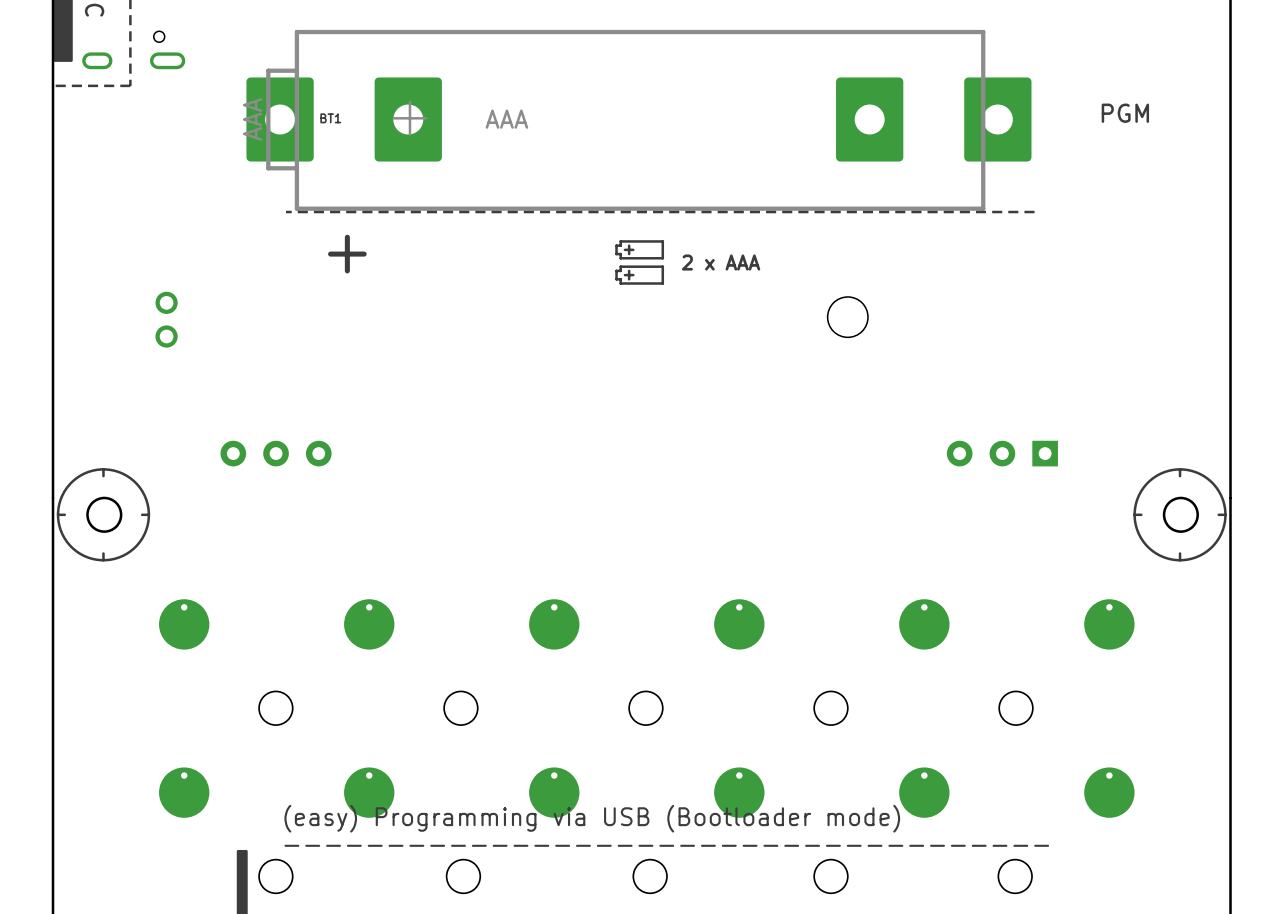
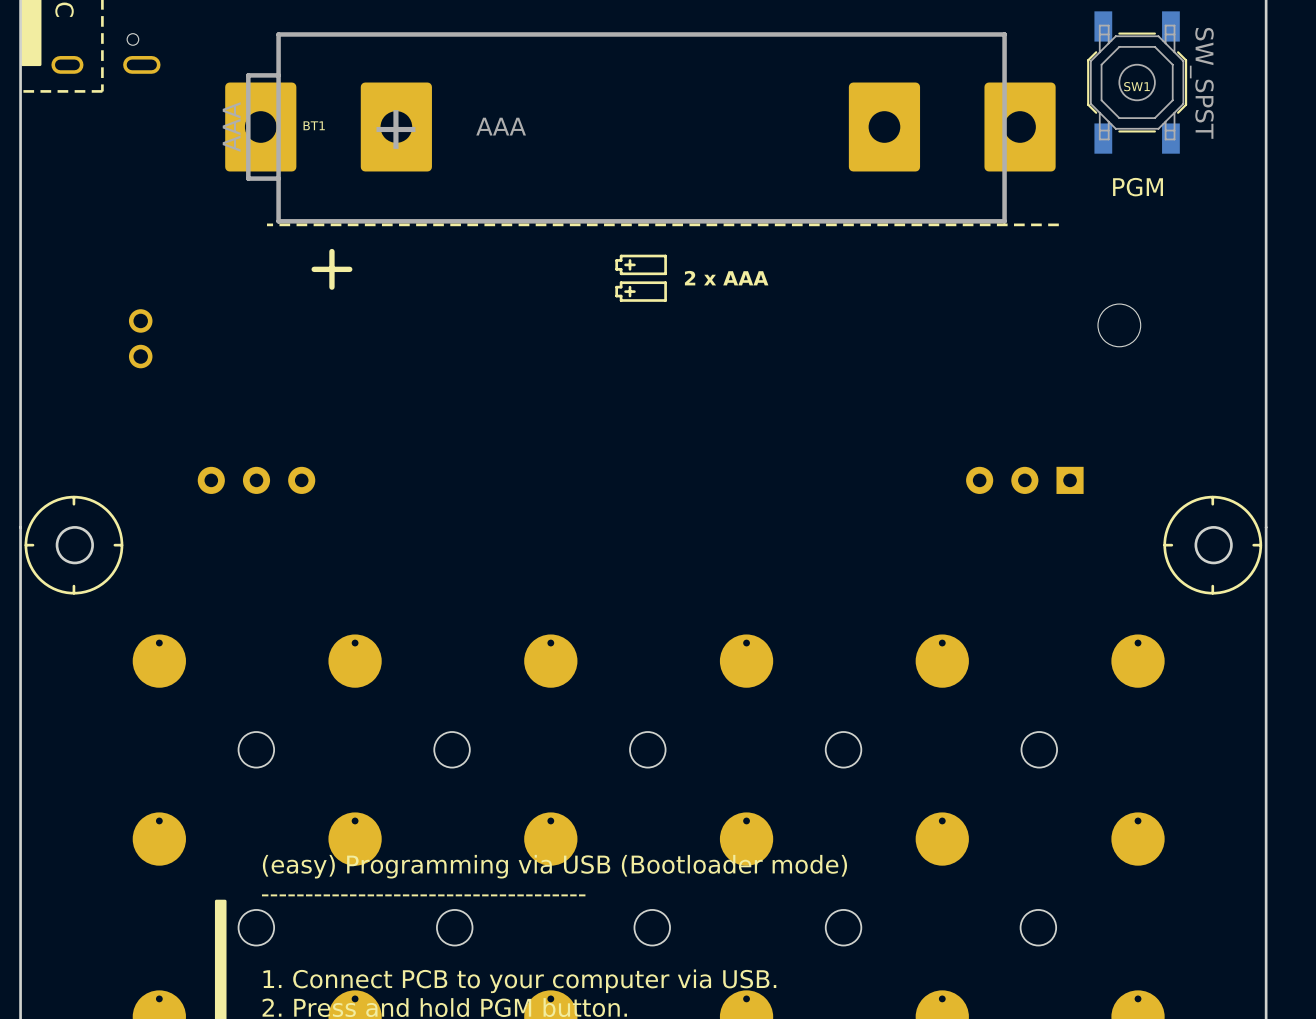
SW1: none -> SW_SPST (1137, 82)
text position: PGM (1125, 113) -> PGM (1138, 187)
round board edge position: (847, 317) -> (1119, 325)

